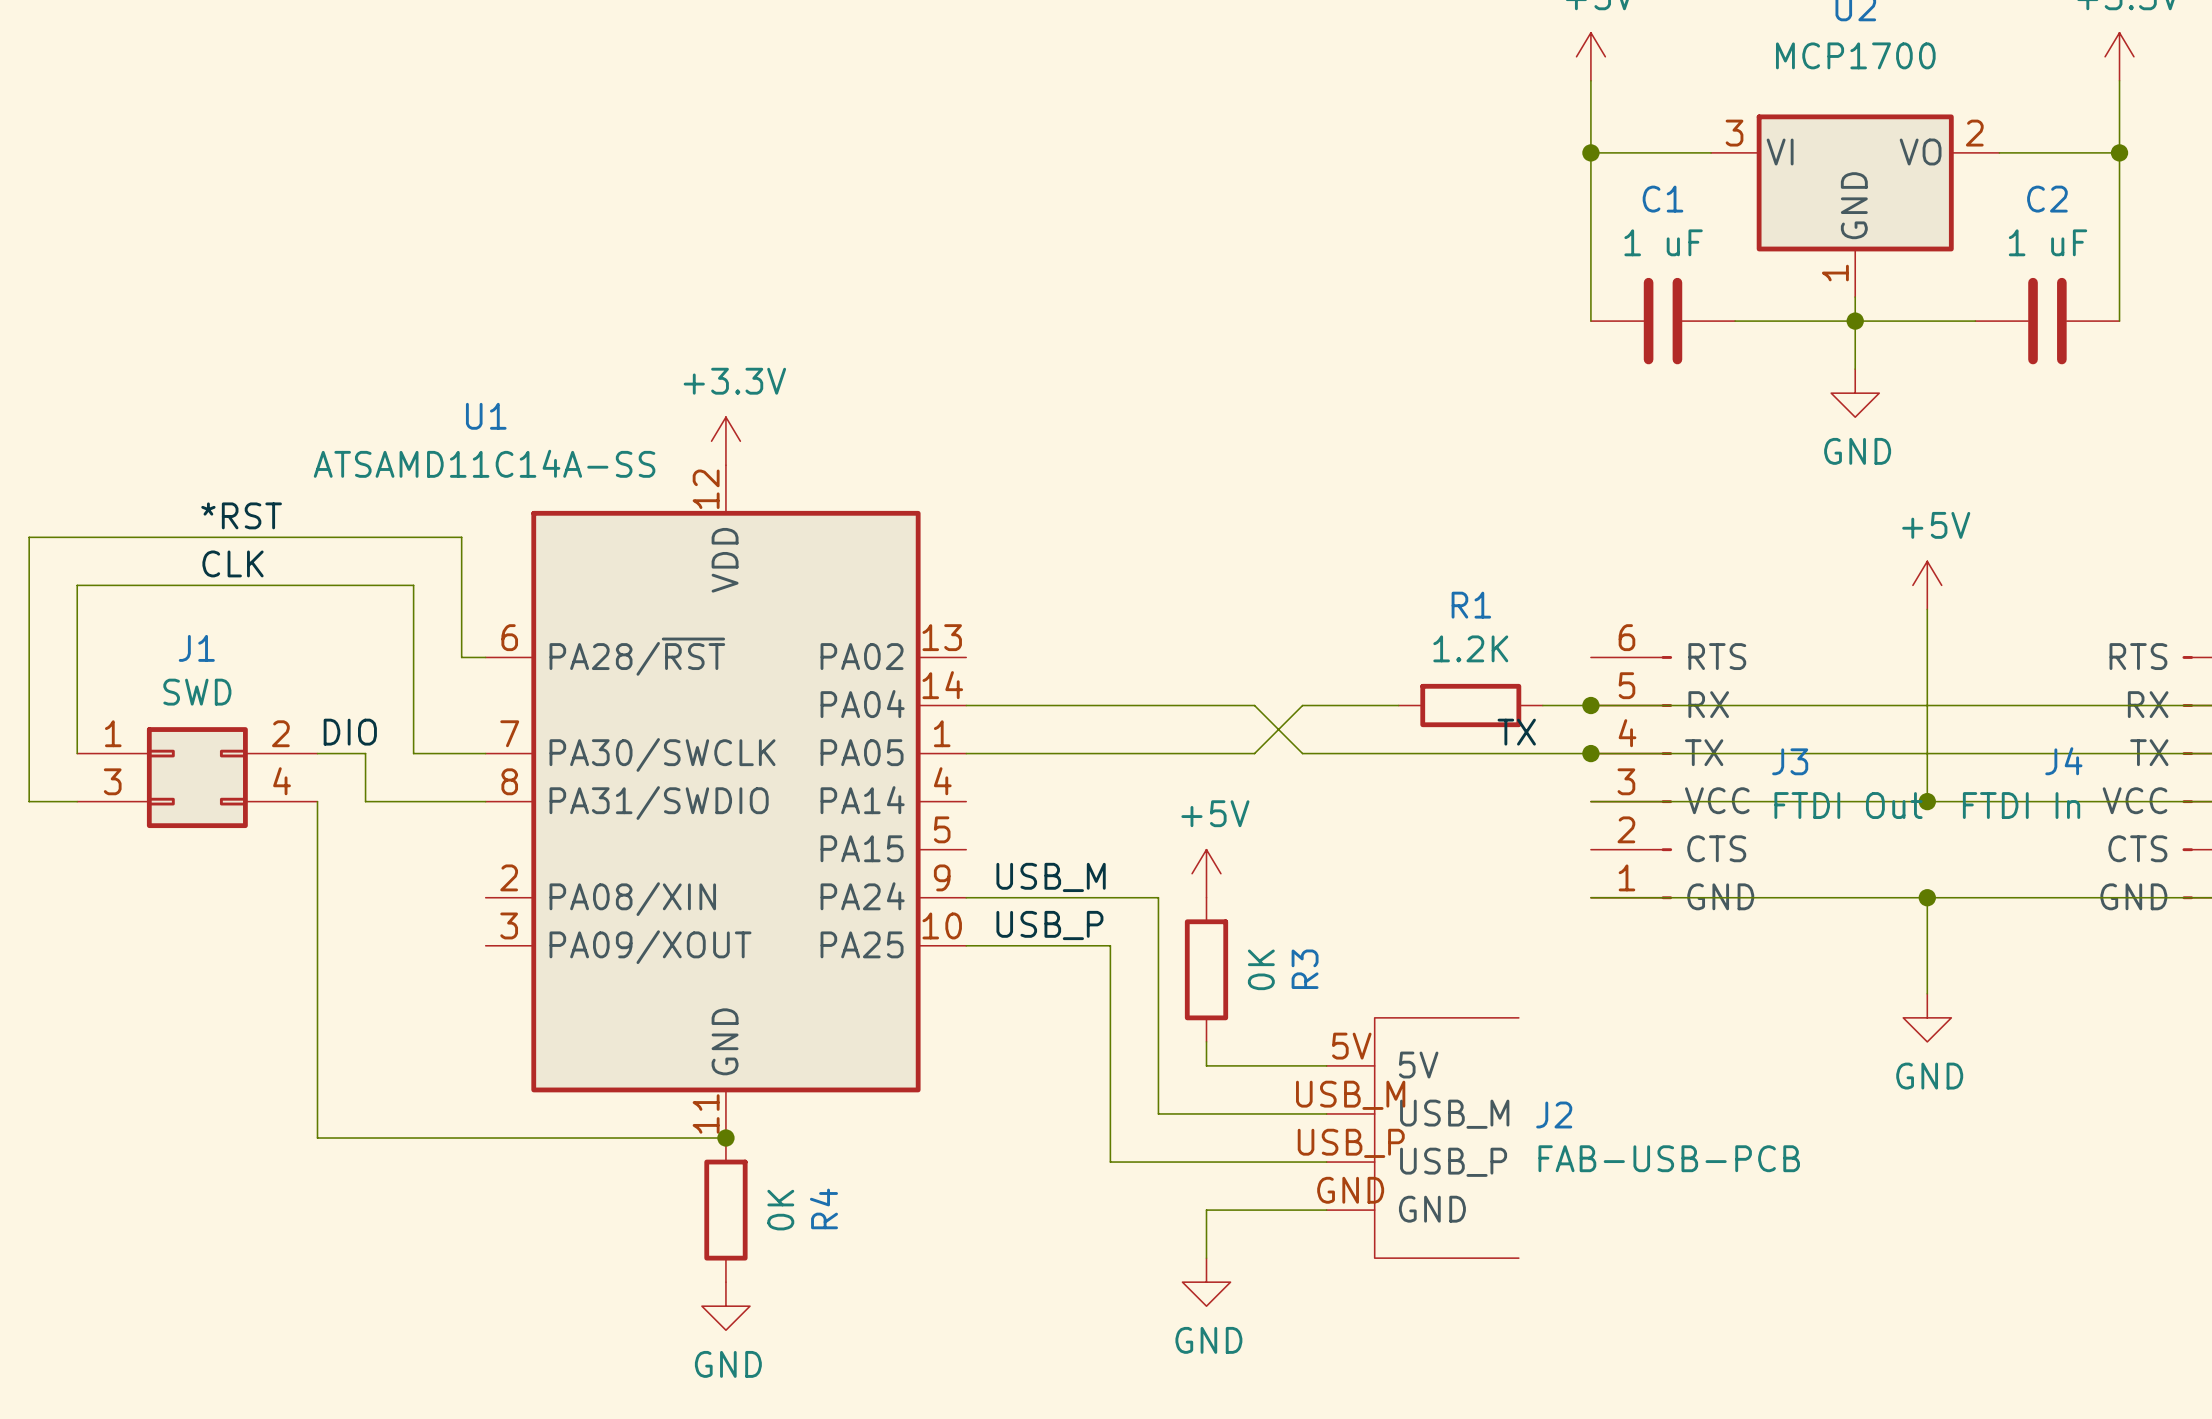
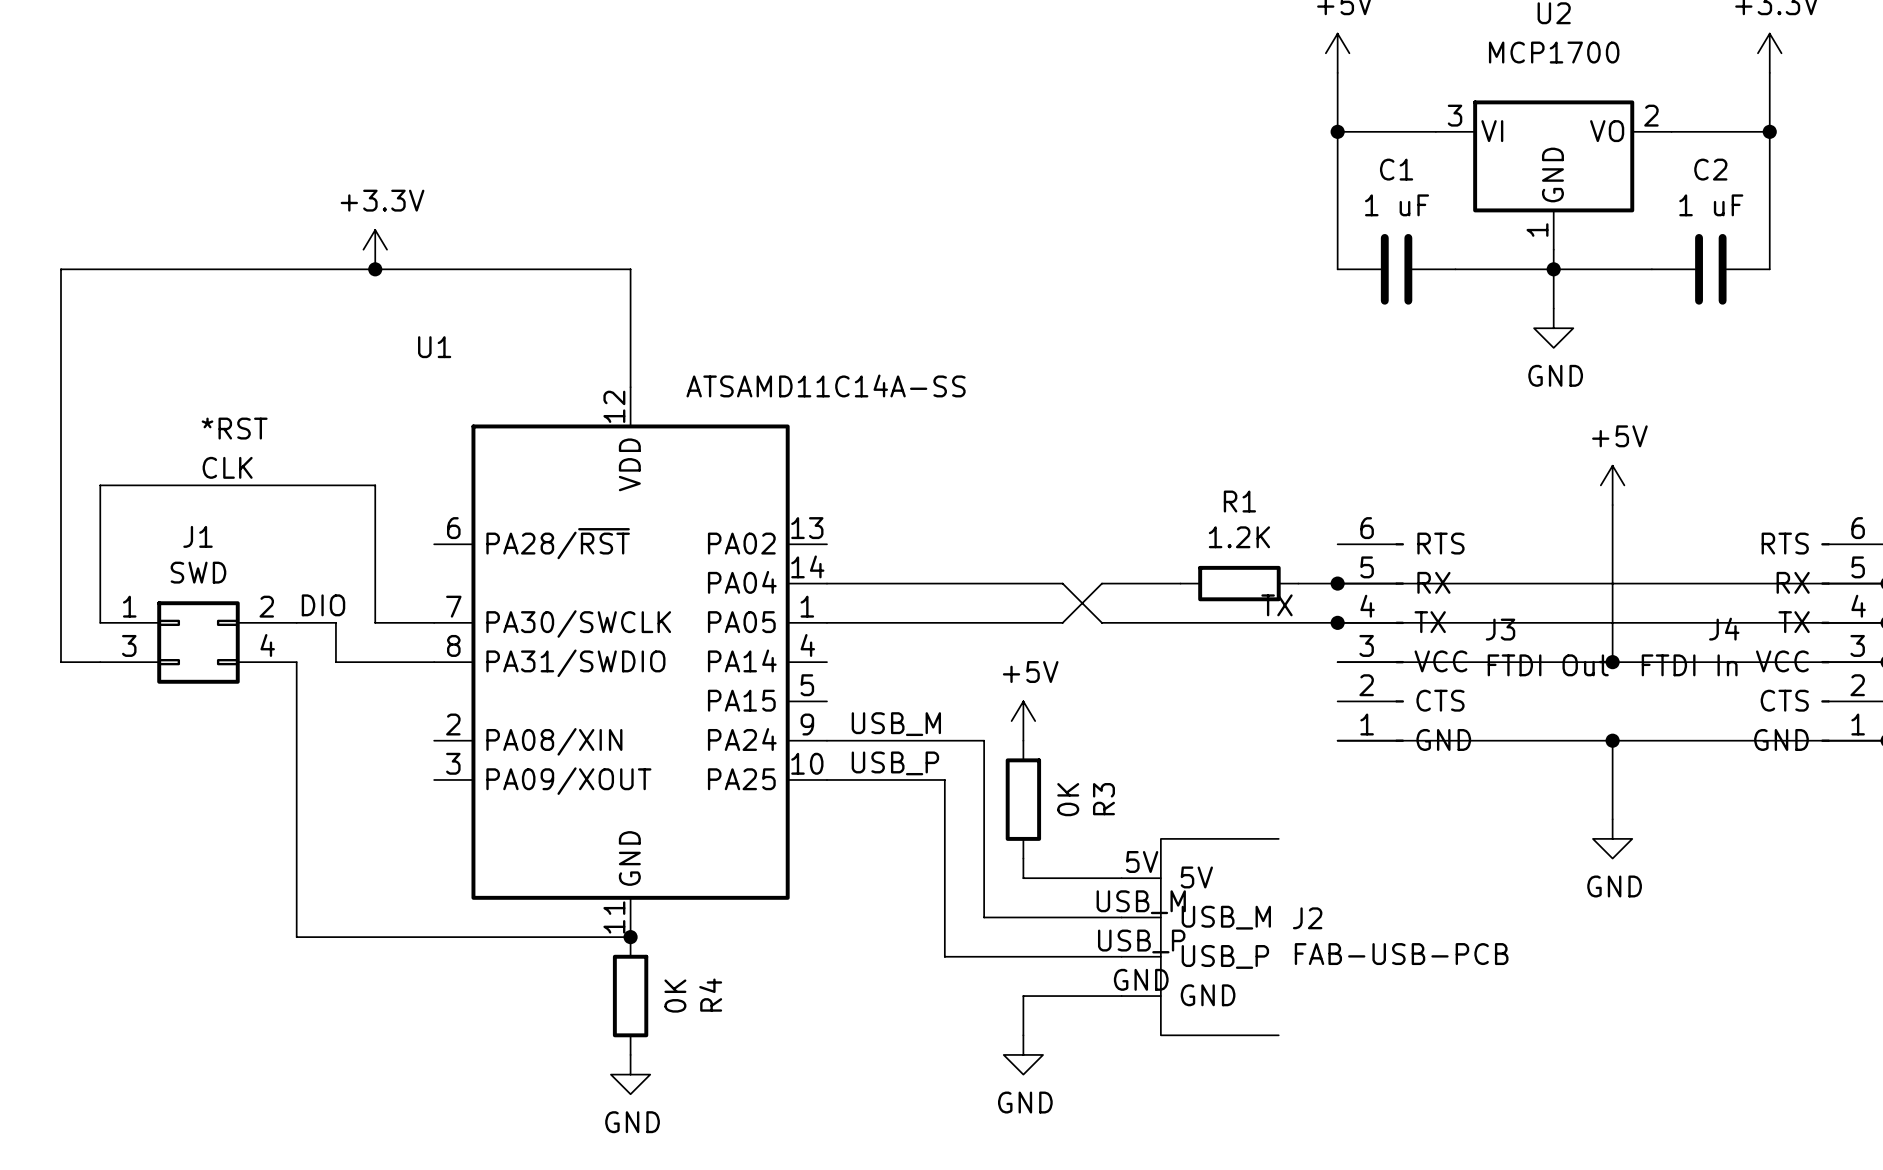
junction: none -> (375, 269)
power symbol position: +3.3V (725, 441) -> +3.3V (375, 249)
U1 value position: ATSAMD11C14A-SS (484, 463) -> ATSAMD11C14A-SS (826, 385)
wire: (29, 537) (461, 537) (461, 657) (485, 657) -> (60, 446) (60, 269) (630, 269) (630, 387)

